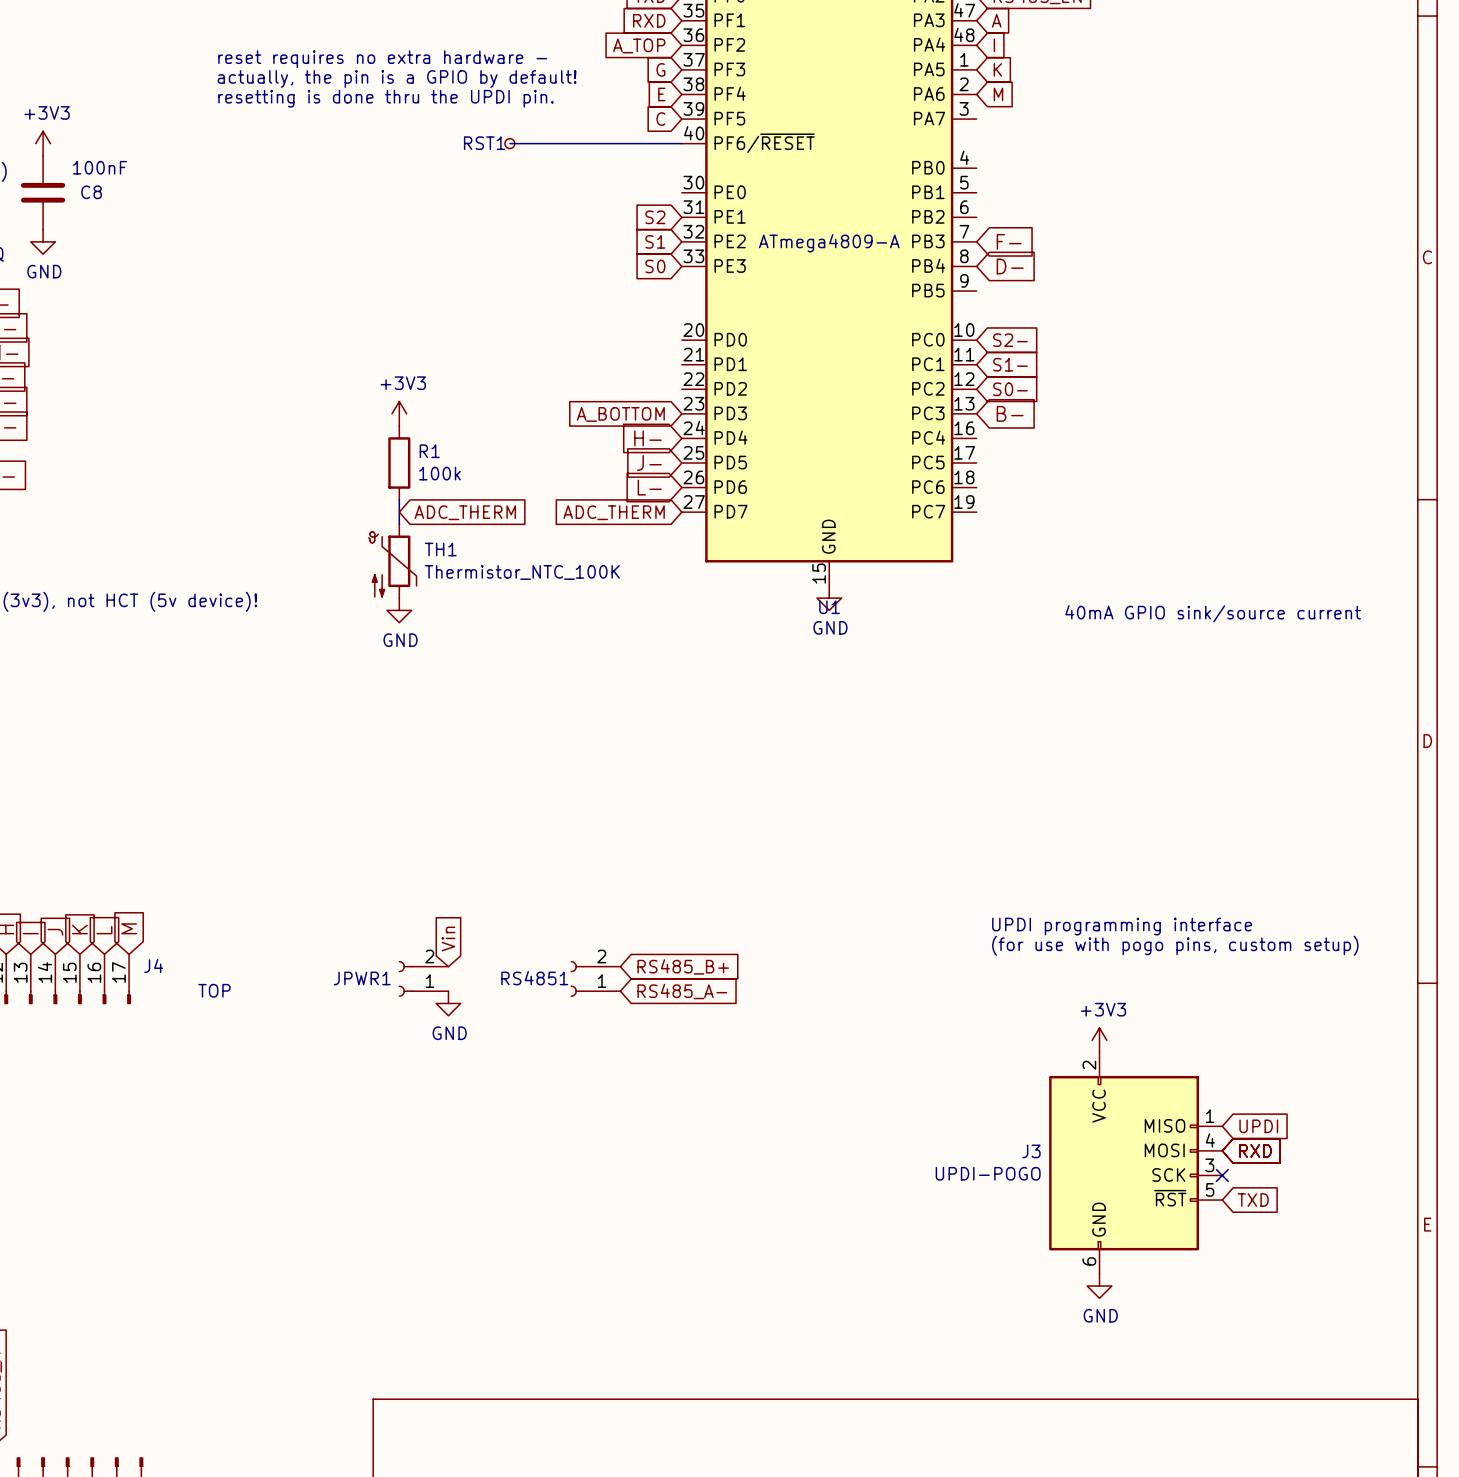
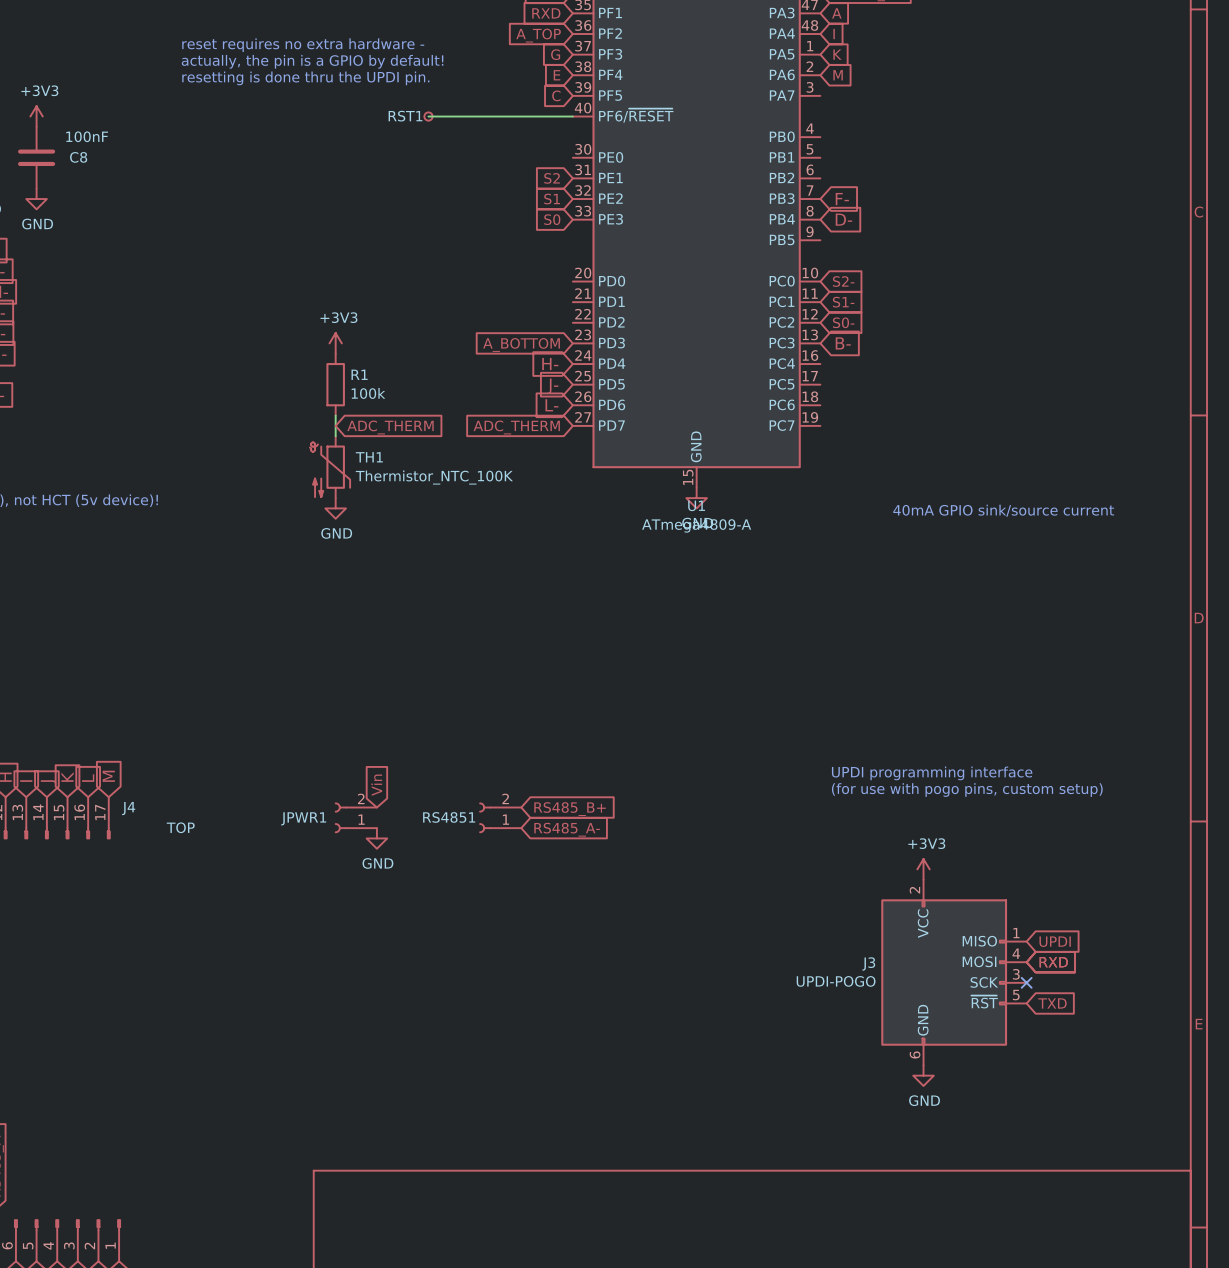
U1 value position: ATmega4809-A (829, 243) -> ATmega4809-A (696, 525)

